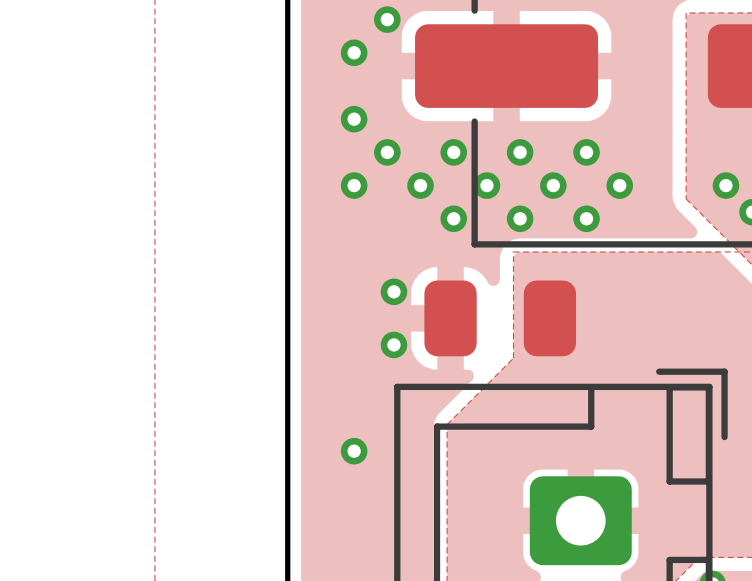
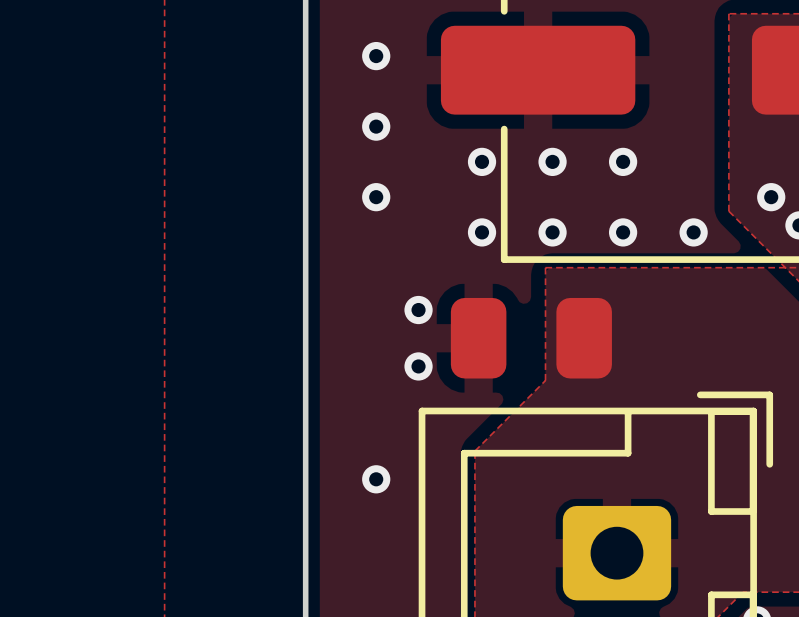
via: (387, 19) -> none
via: (387, 152) -> none
via: (420, 185) -> none
via: (486, 185) -> none
via: (553, 185) -> none
via position: (619, 185) -> (693, 232)

